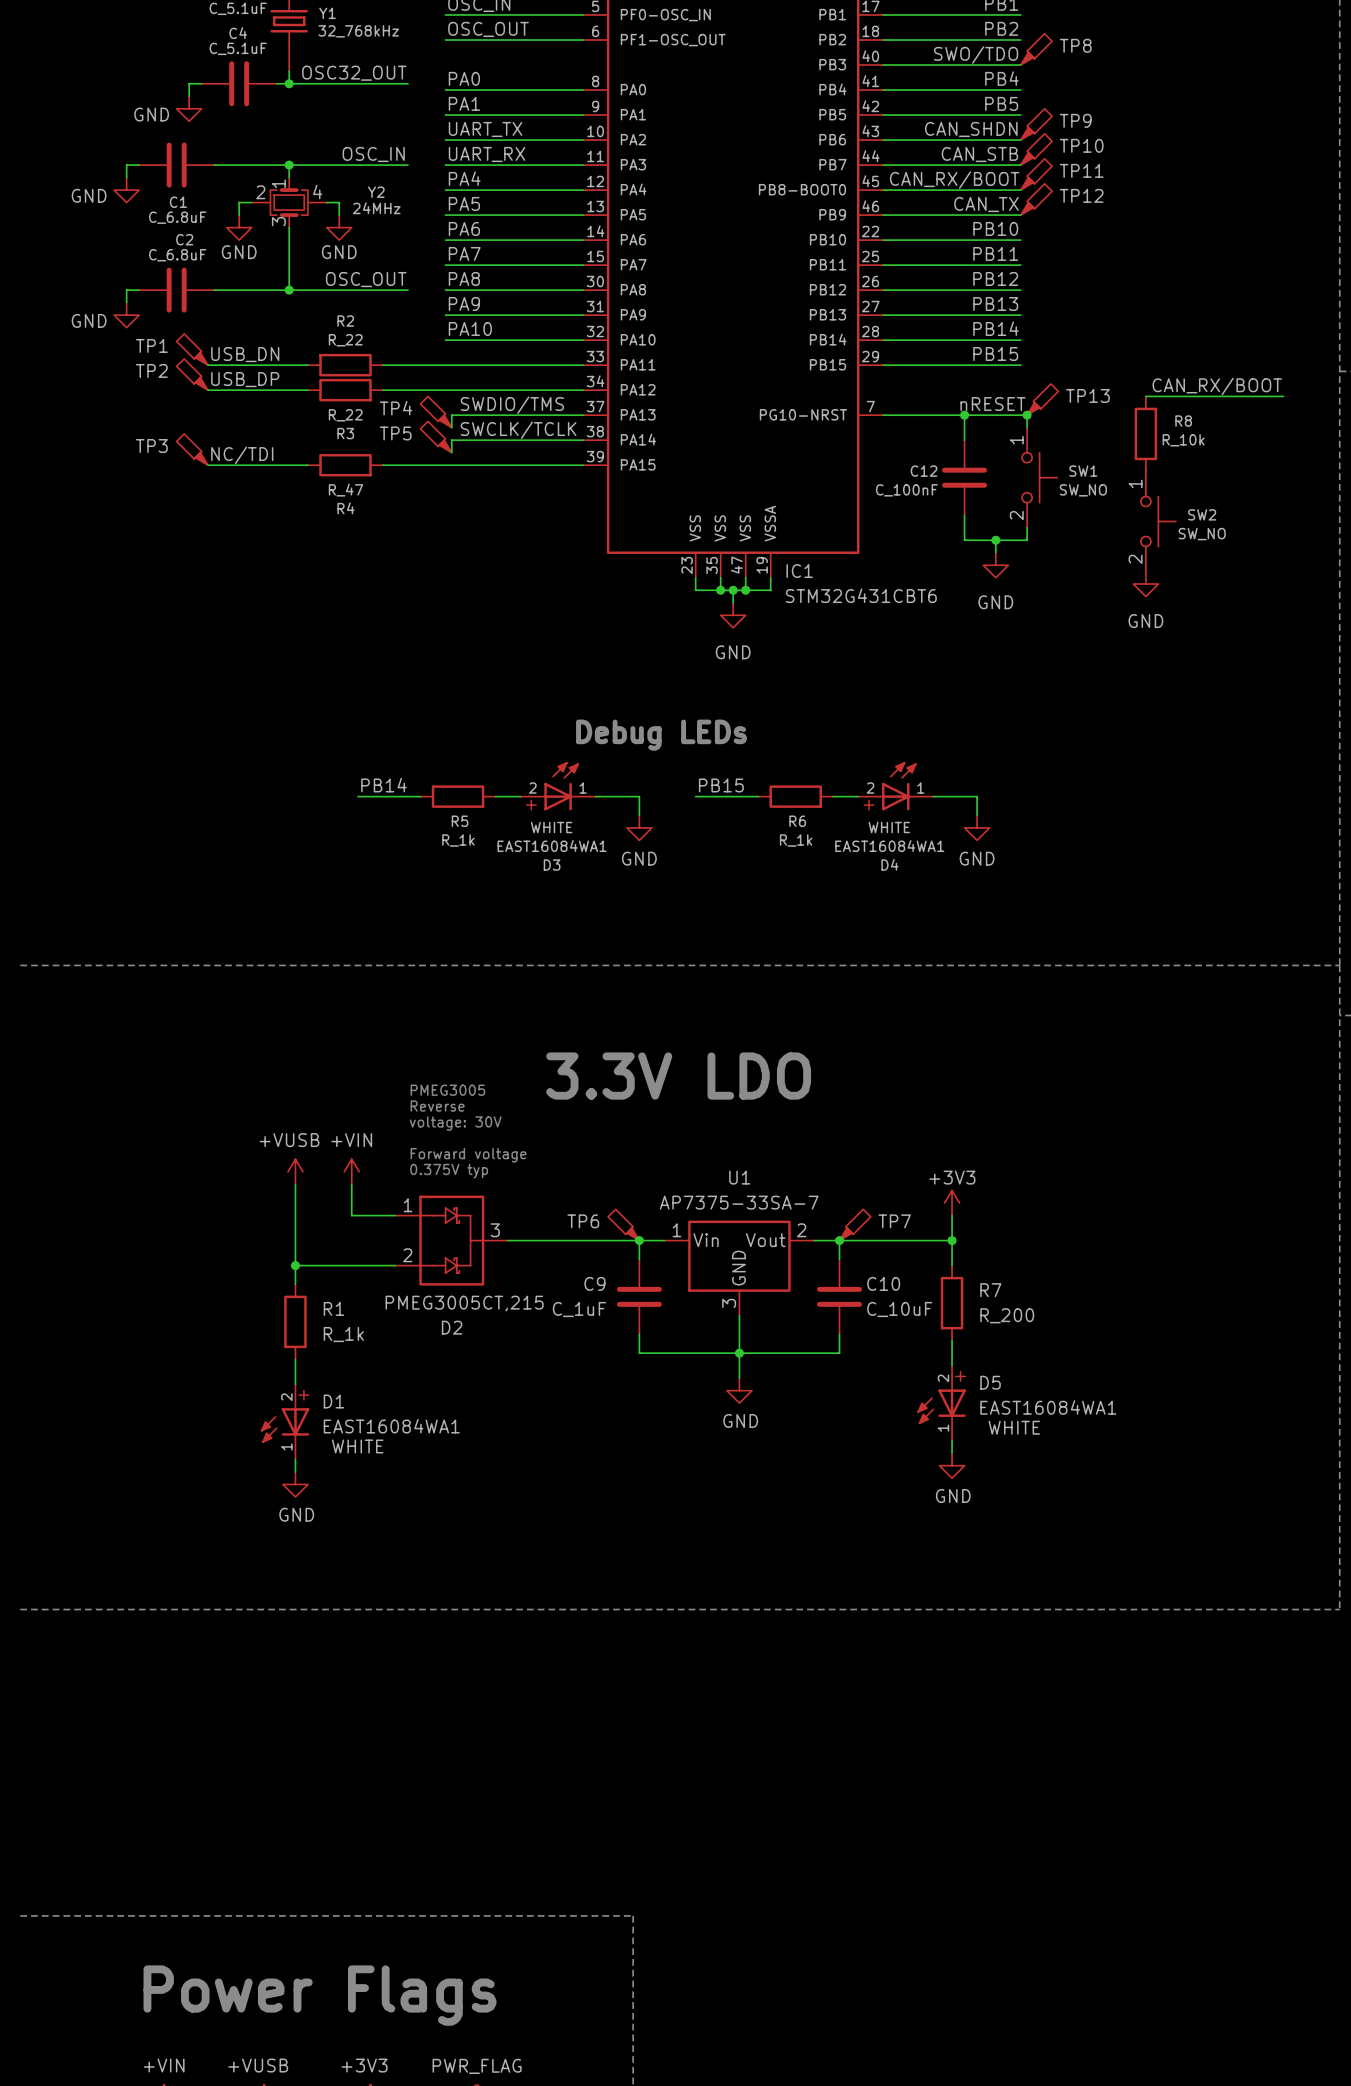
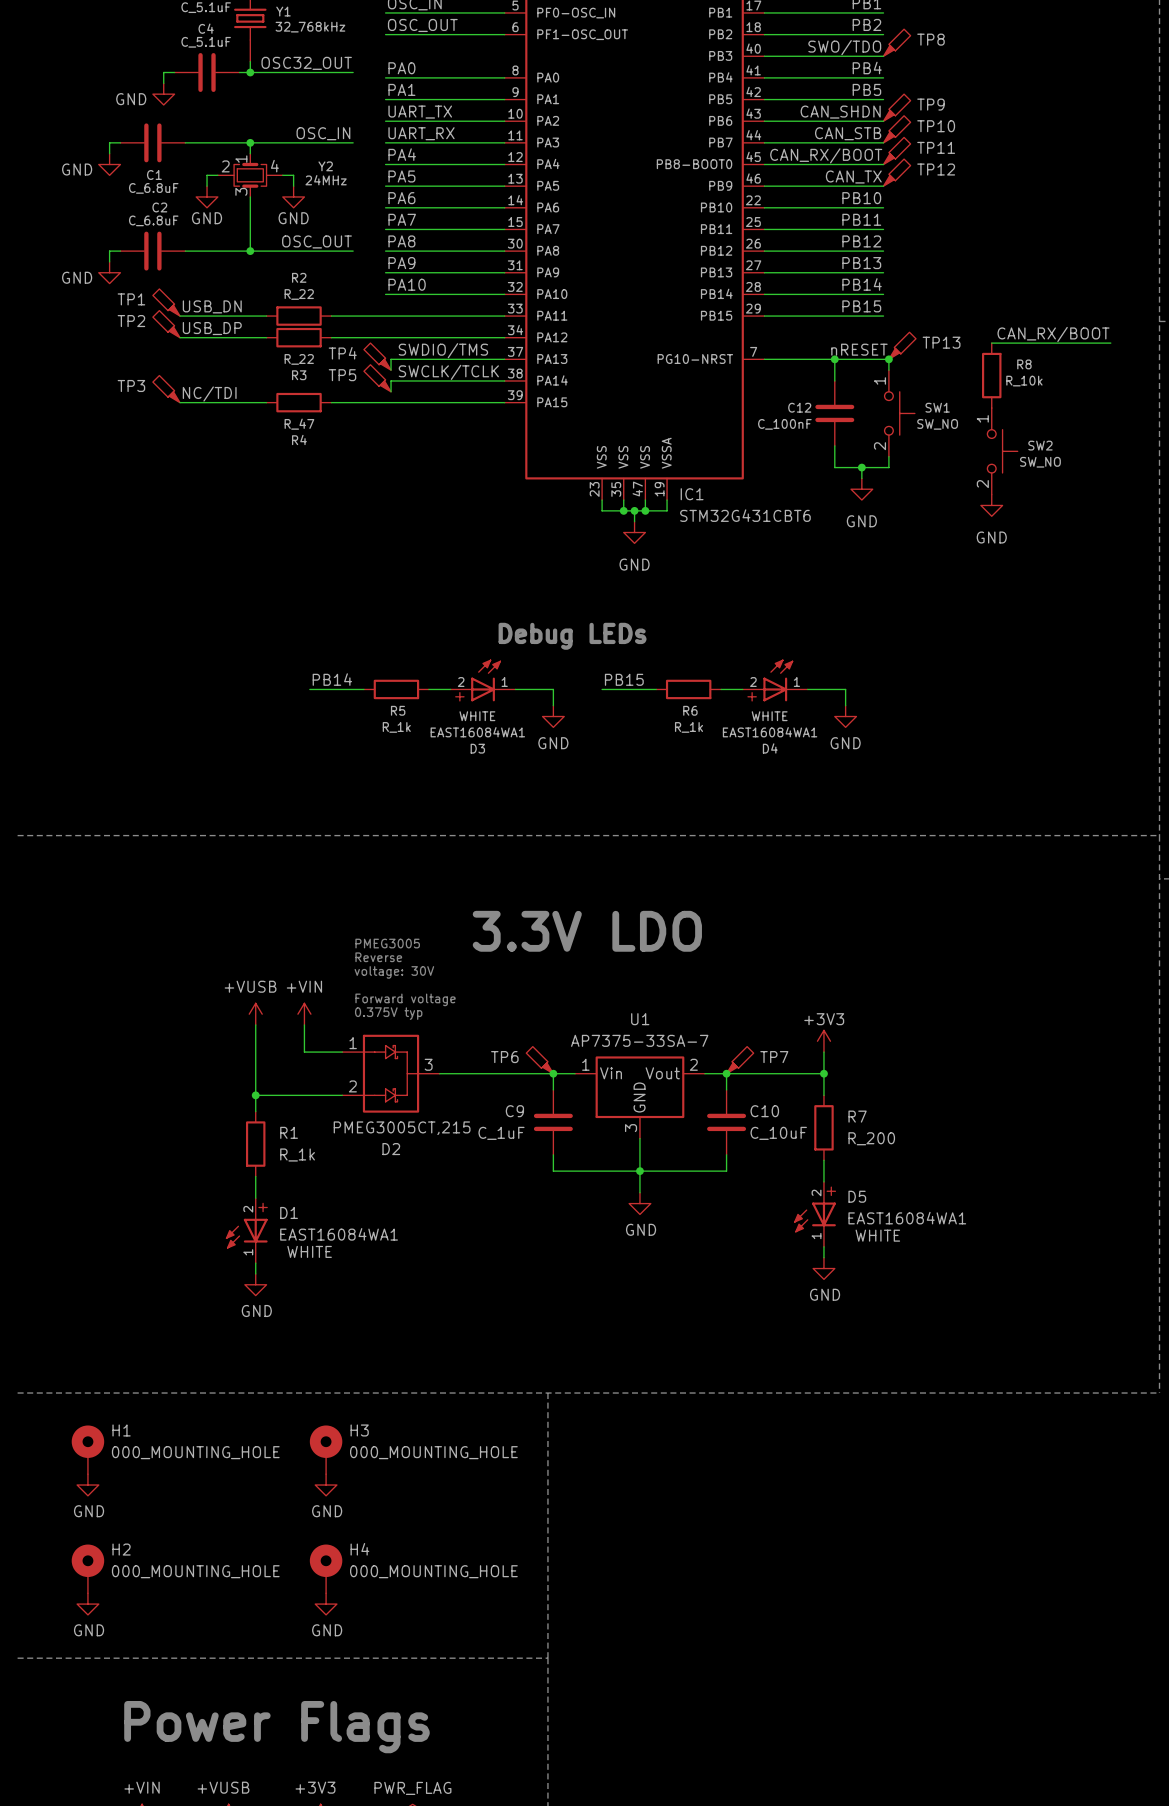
line: none -> (547, 1393) (547, 1658)
H1: none -> 000_MOUNTING_HOLE (87, 1449)
H3: none -> 000_MOUNTING_HOLE (326, 1449)
power symbol: none -> GND (87, 1485)
power symbol: none -> GND (326, 1485)
H2: none -> 000_MOUNTING_HOLE (87, 1568)
H4: none -> 000_MOUNTING_HOLE (326, 1568)
power symbol: none -> GND (87, 1604)
power symbol: none -> GND (326, 1604)

